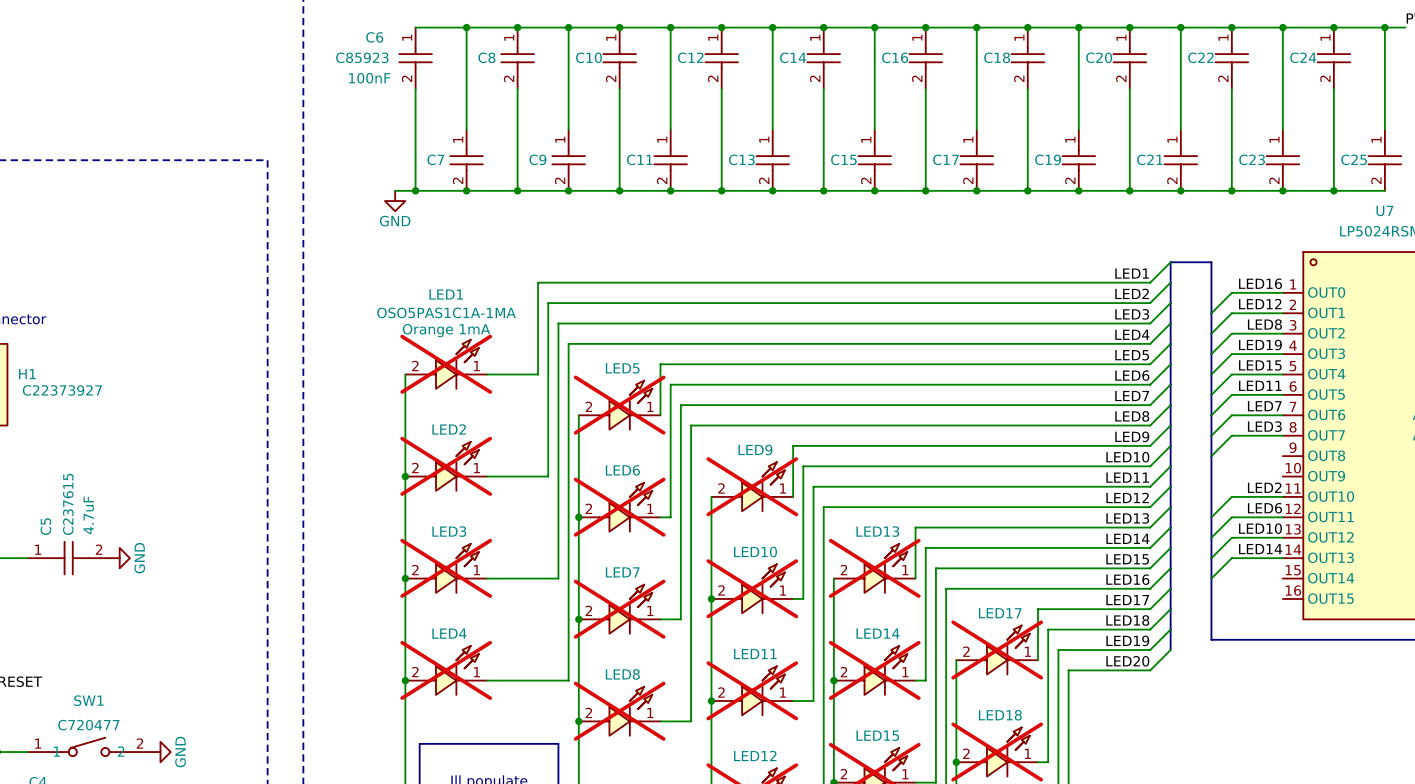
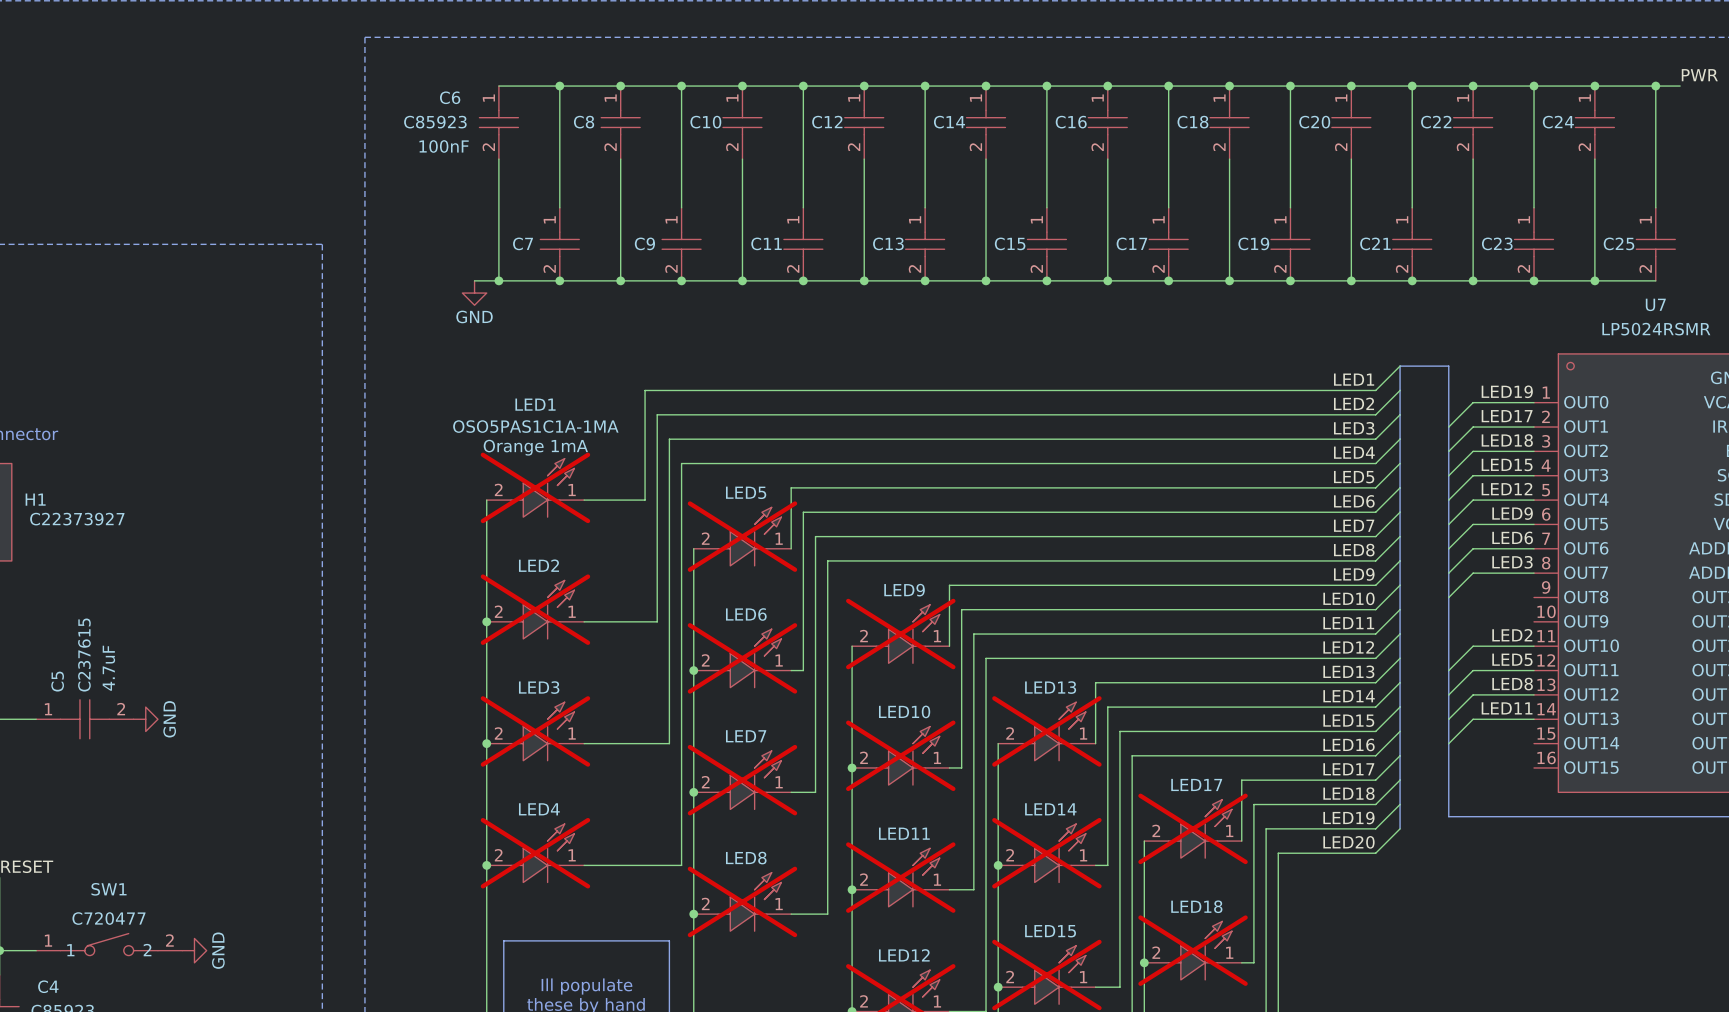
label: LED16 (1260, 283) -> LED19 (1507, 391)
label: LED12 (1260, 304) -> LED17 (1507, 416)
label: LED8 (1264, 324) -> LED18 (1507, 440)
label: LED19 (1260, 345) -> LED15 (1507, 464)
label: LED15 (1260, 365) -> LED12 (1507, 489)
label: LED11 (1260, 385) -> LED9 (1512, 513)
label: LED7 (1264, 406) -> LED6 (1512, 537)
label: LED6 (1264, 508) -> LED5 (1512, 659)
label: LED10 (1260, 528) -> LED8 (1512, 684)
label: LED14 (1260, 549) -> LED11 (1507, 708)

